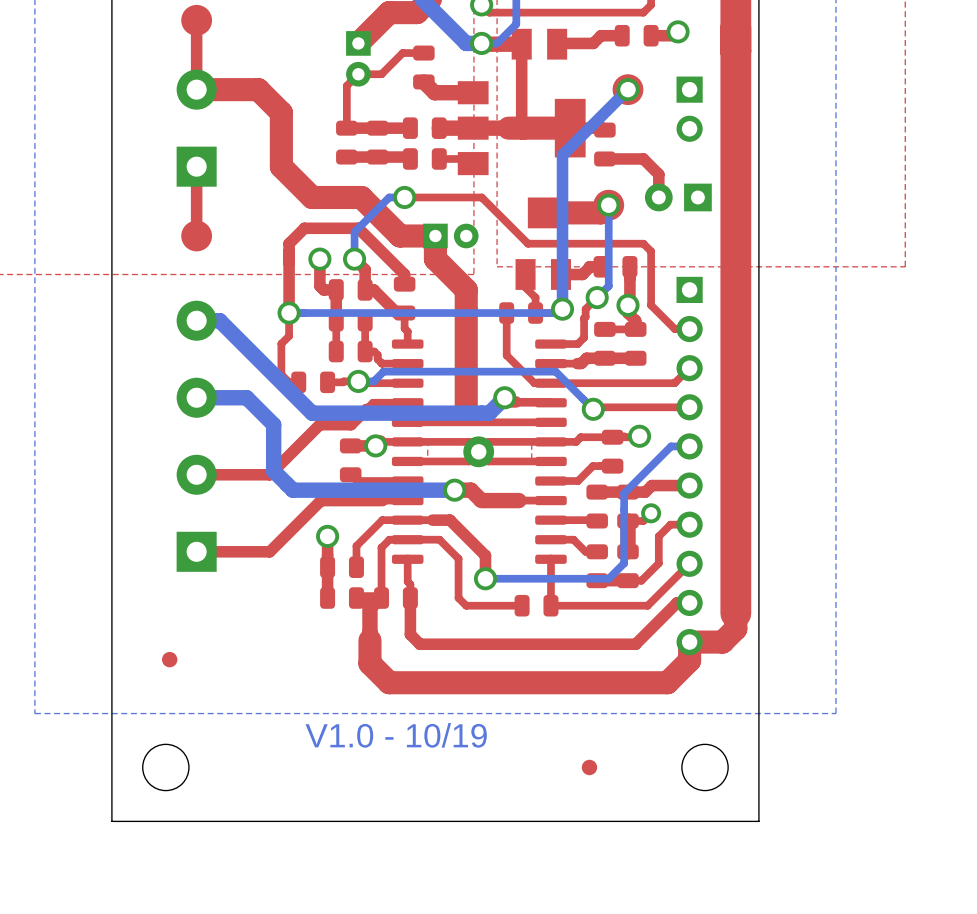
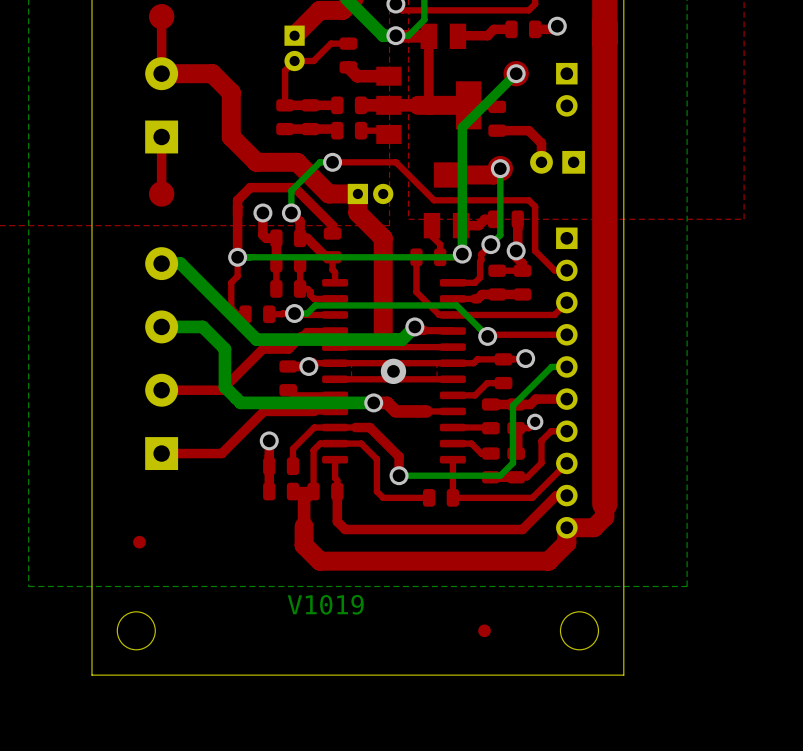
text: V1.0 - 10/19 (396, 735) -> V1019 (325, 604)

